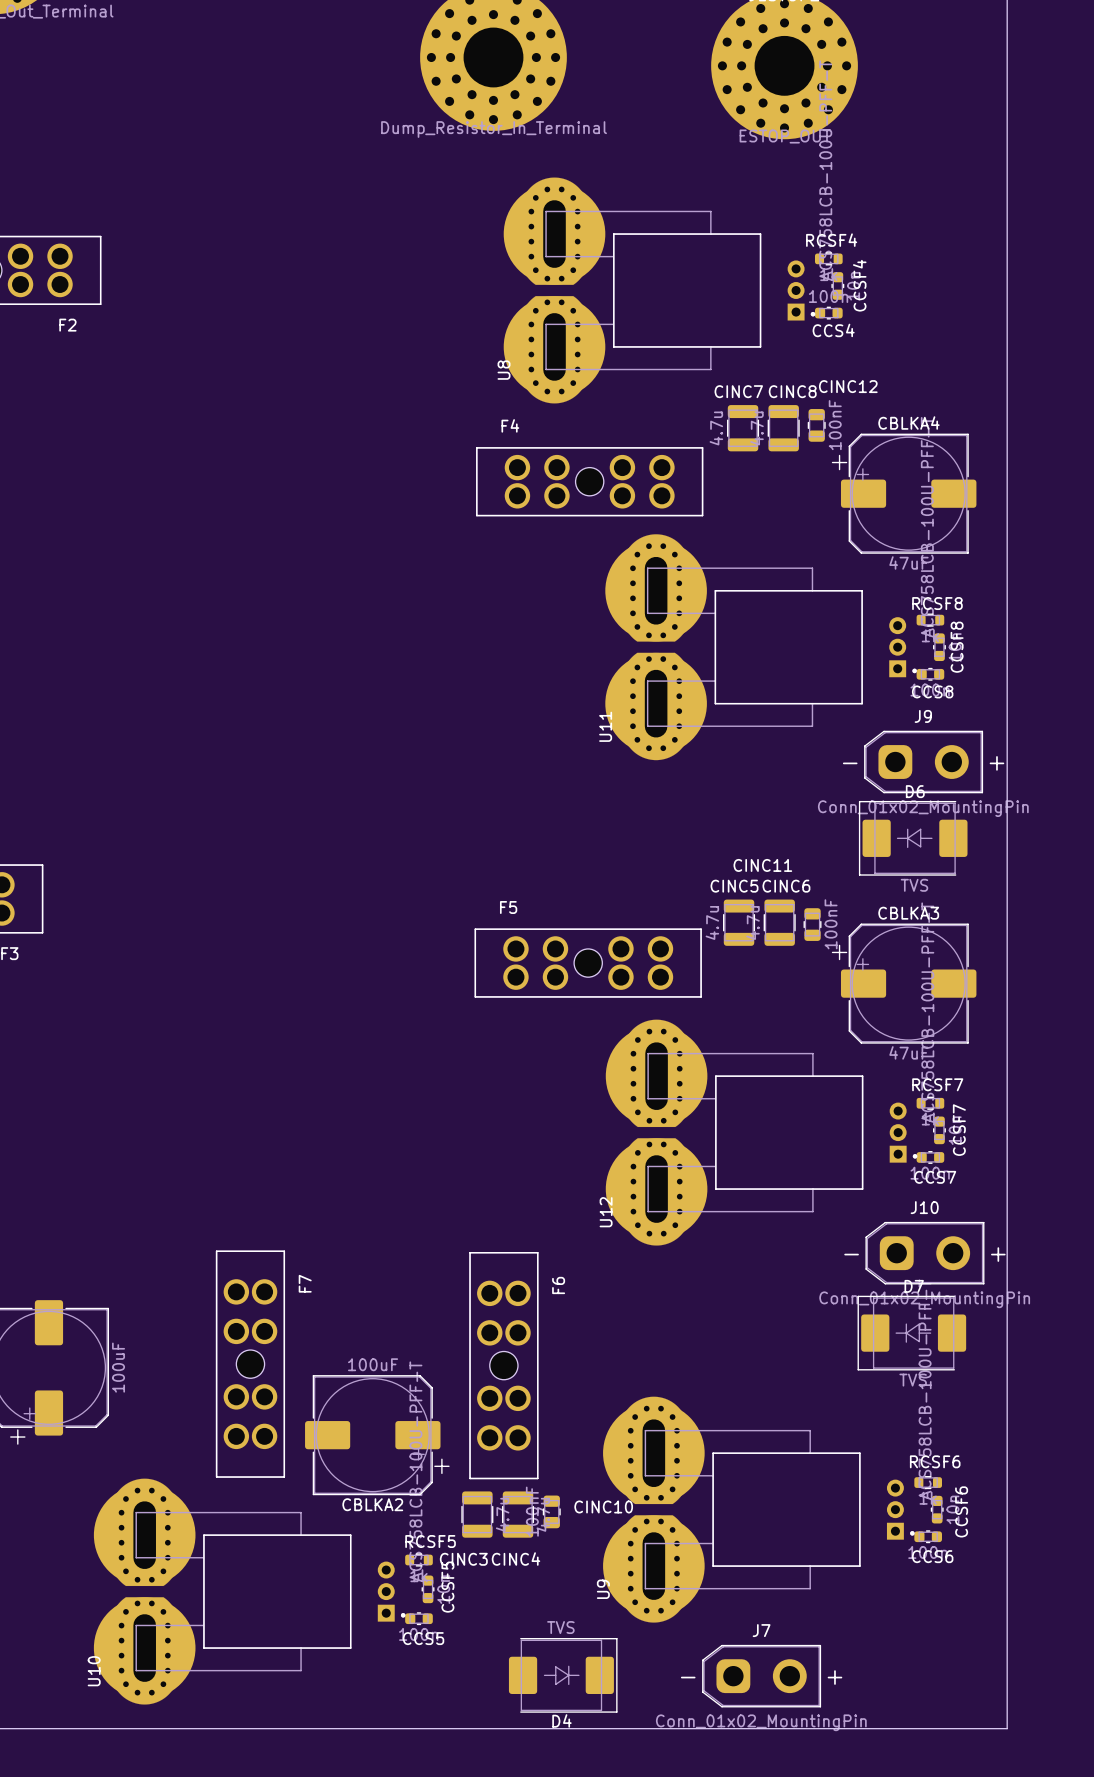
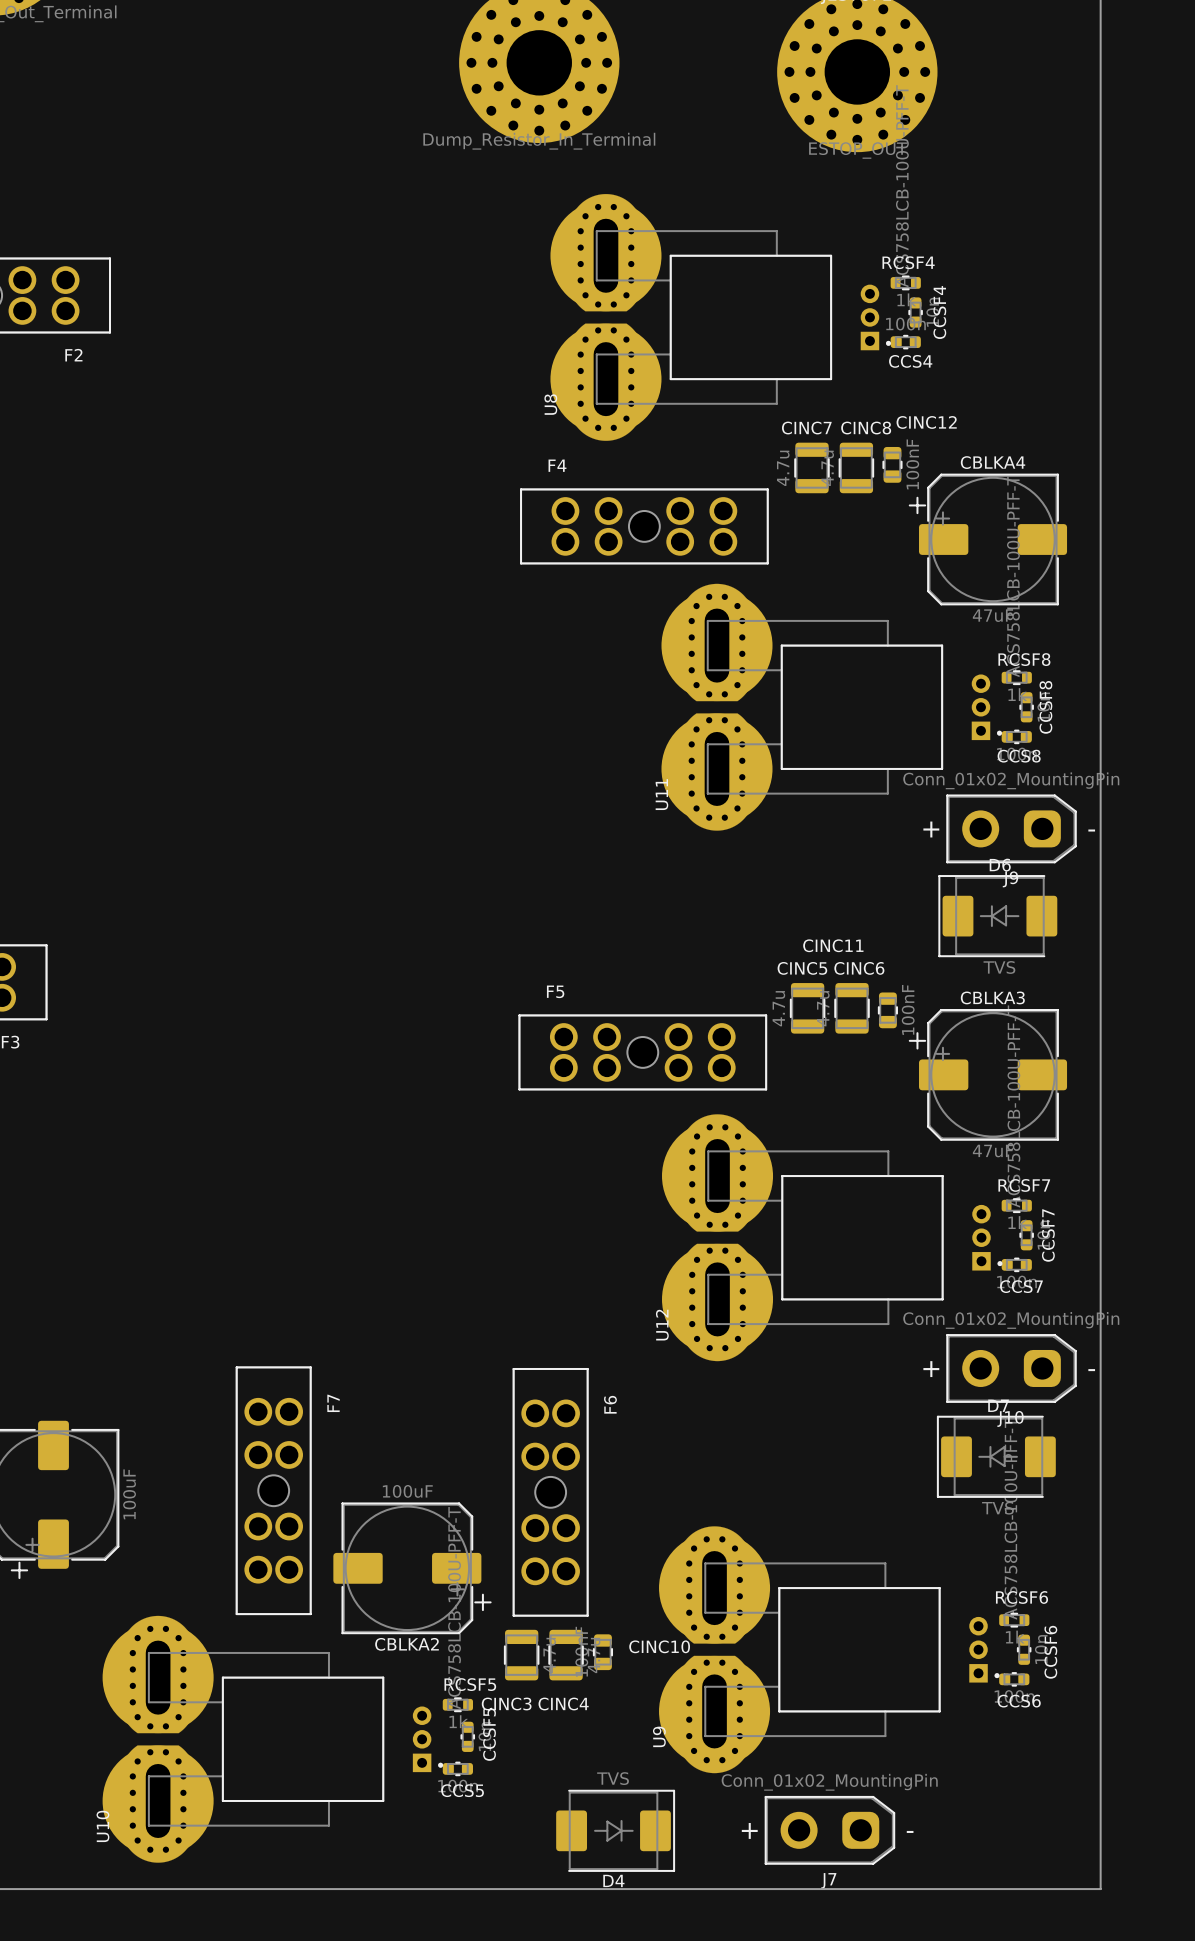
J9 rotation: 0° (923, 762) -> 180° (1011, 828)
J10 rotation: 0° (924, 1253) -> 180° (1011, 1368)
J7 rotation: 0° (761, 1676) -> 180° (829, 1830)

